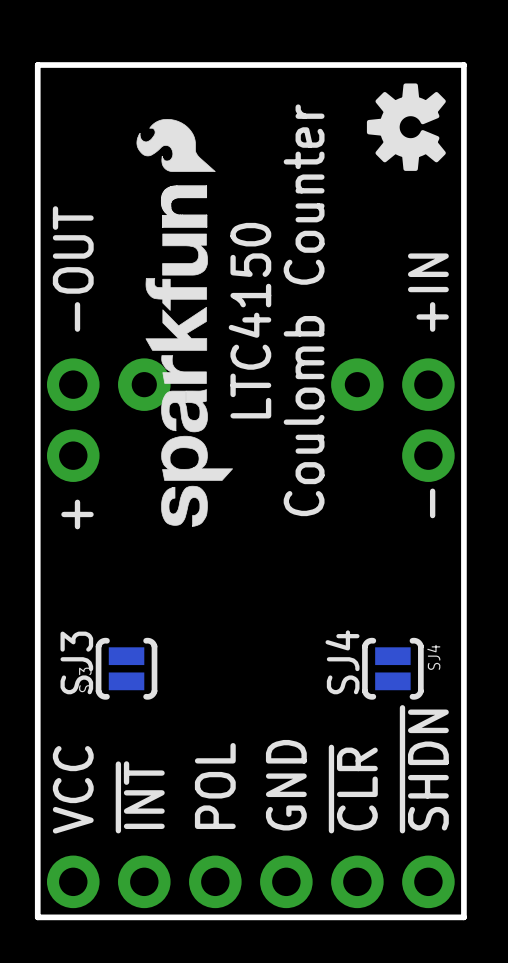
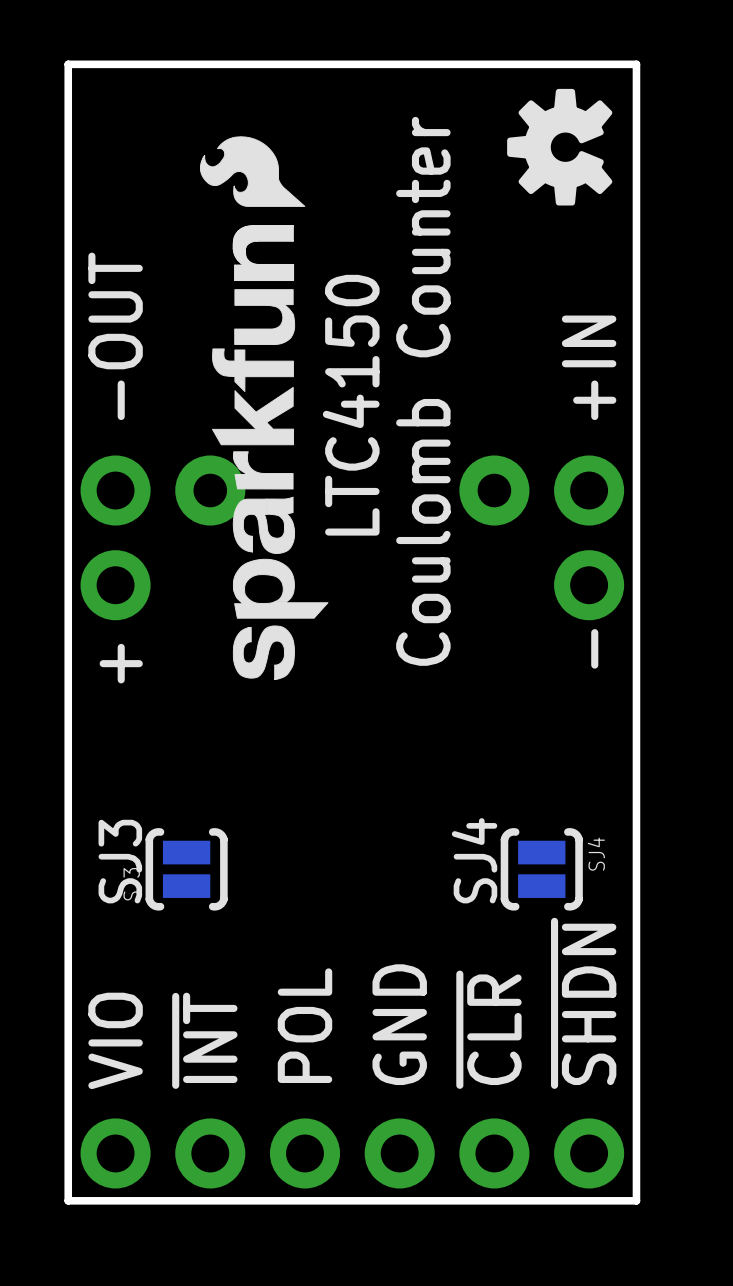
text: VCC (73, 789) -> VIO (115, 1040)

